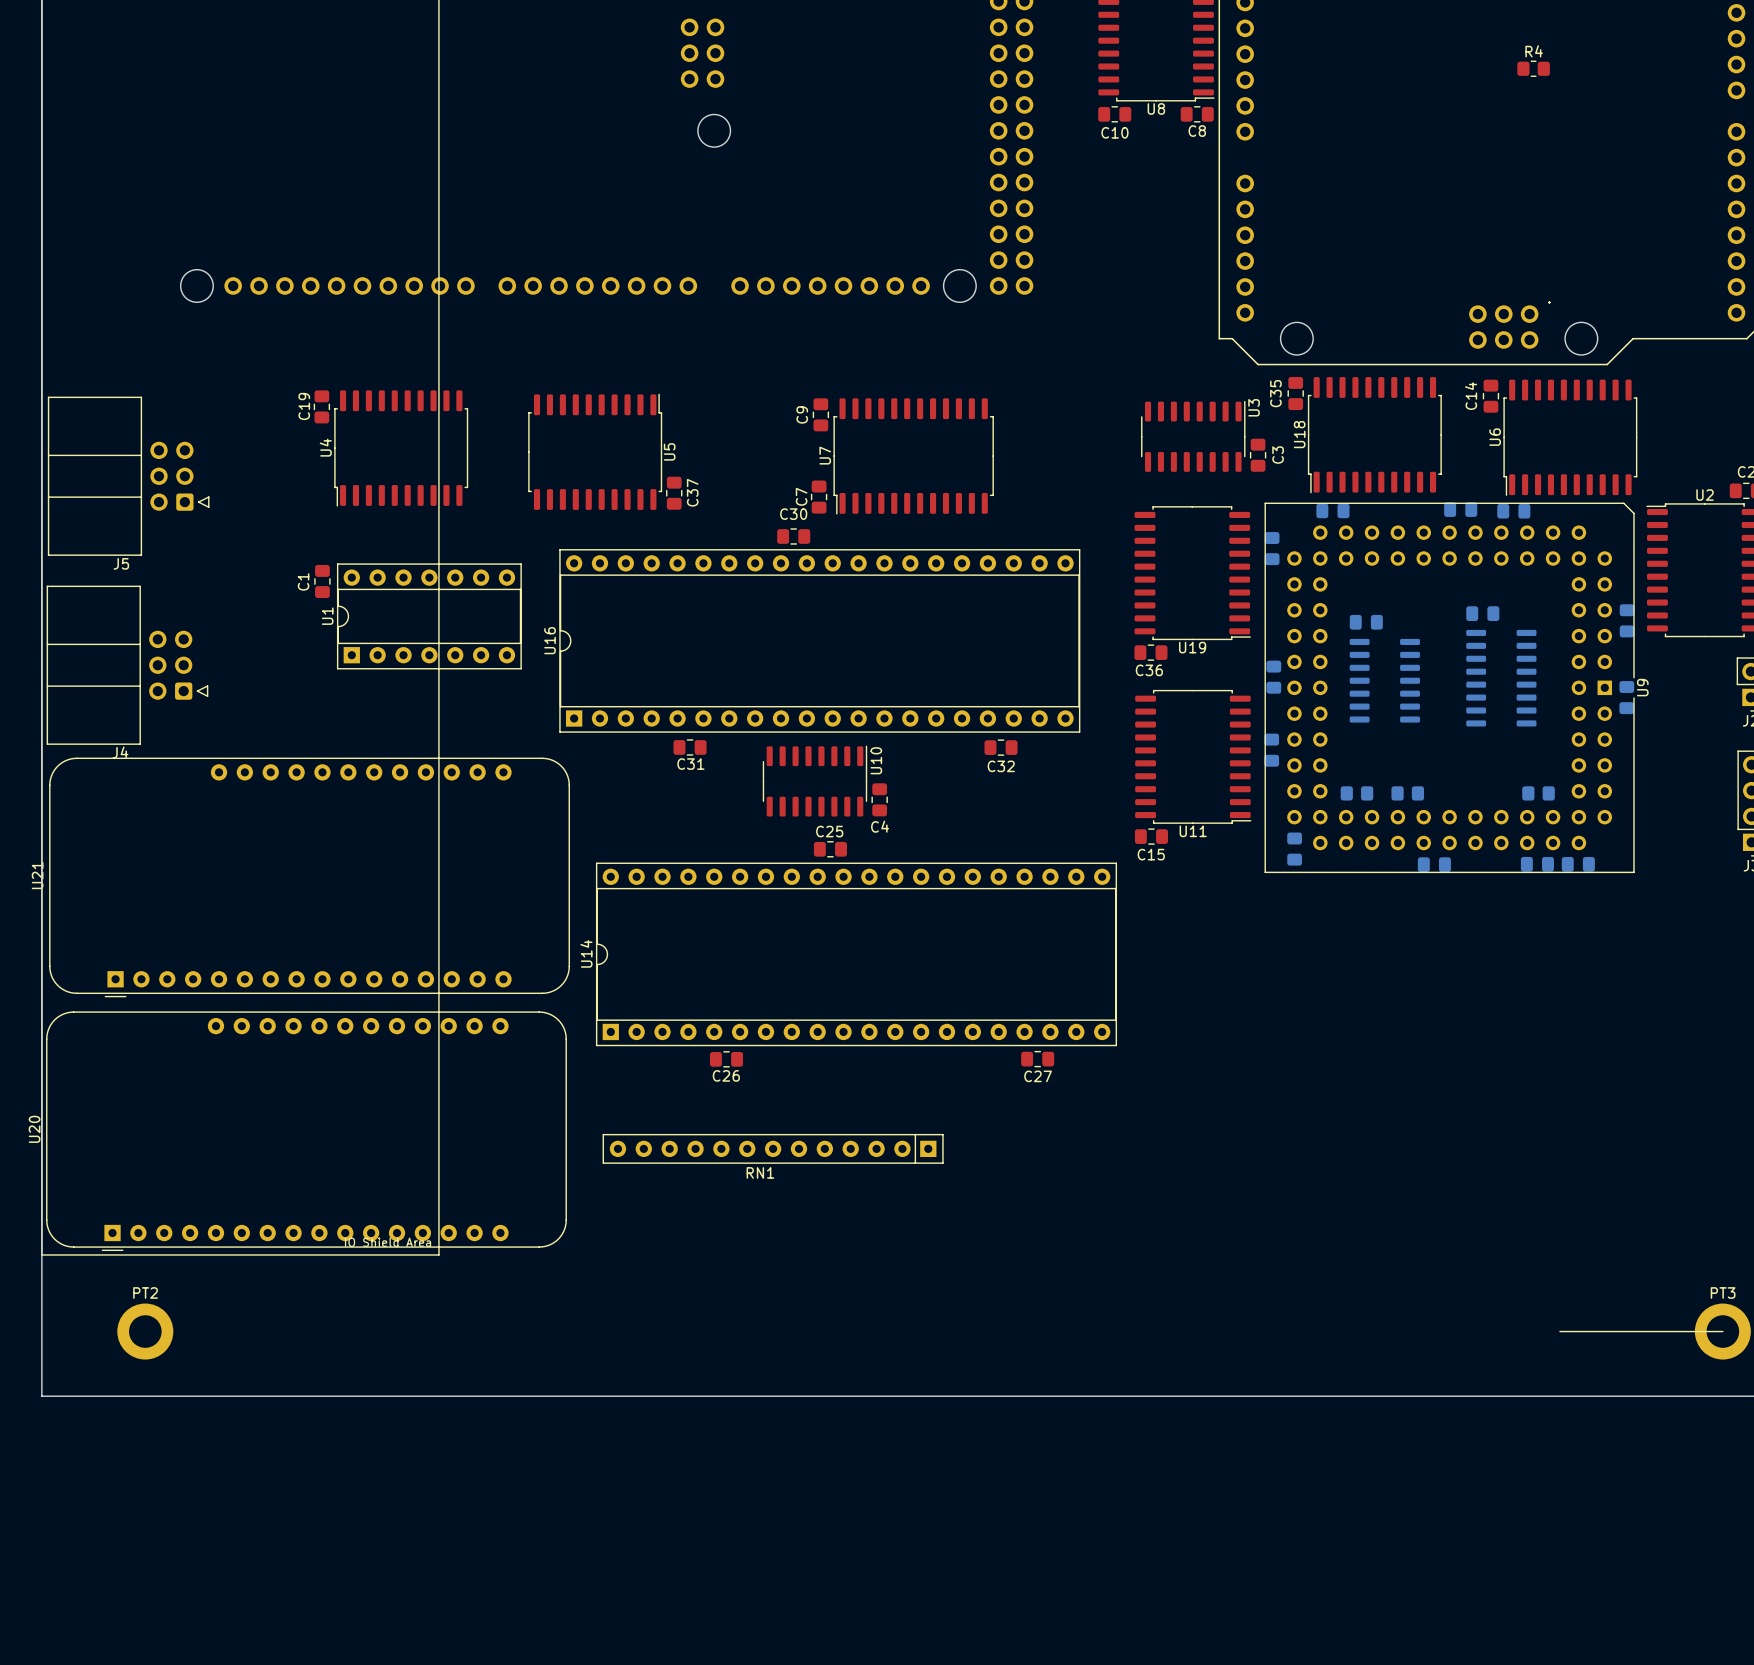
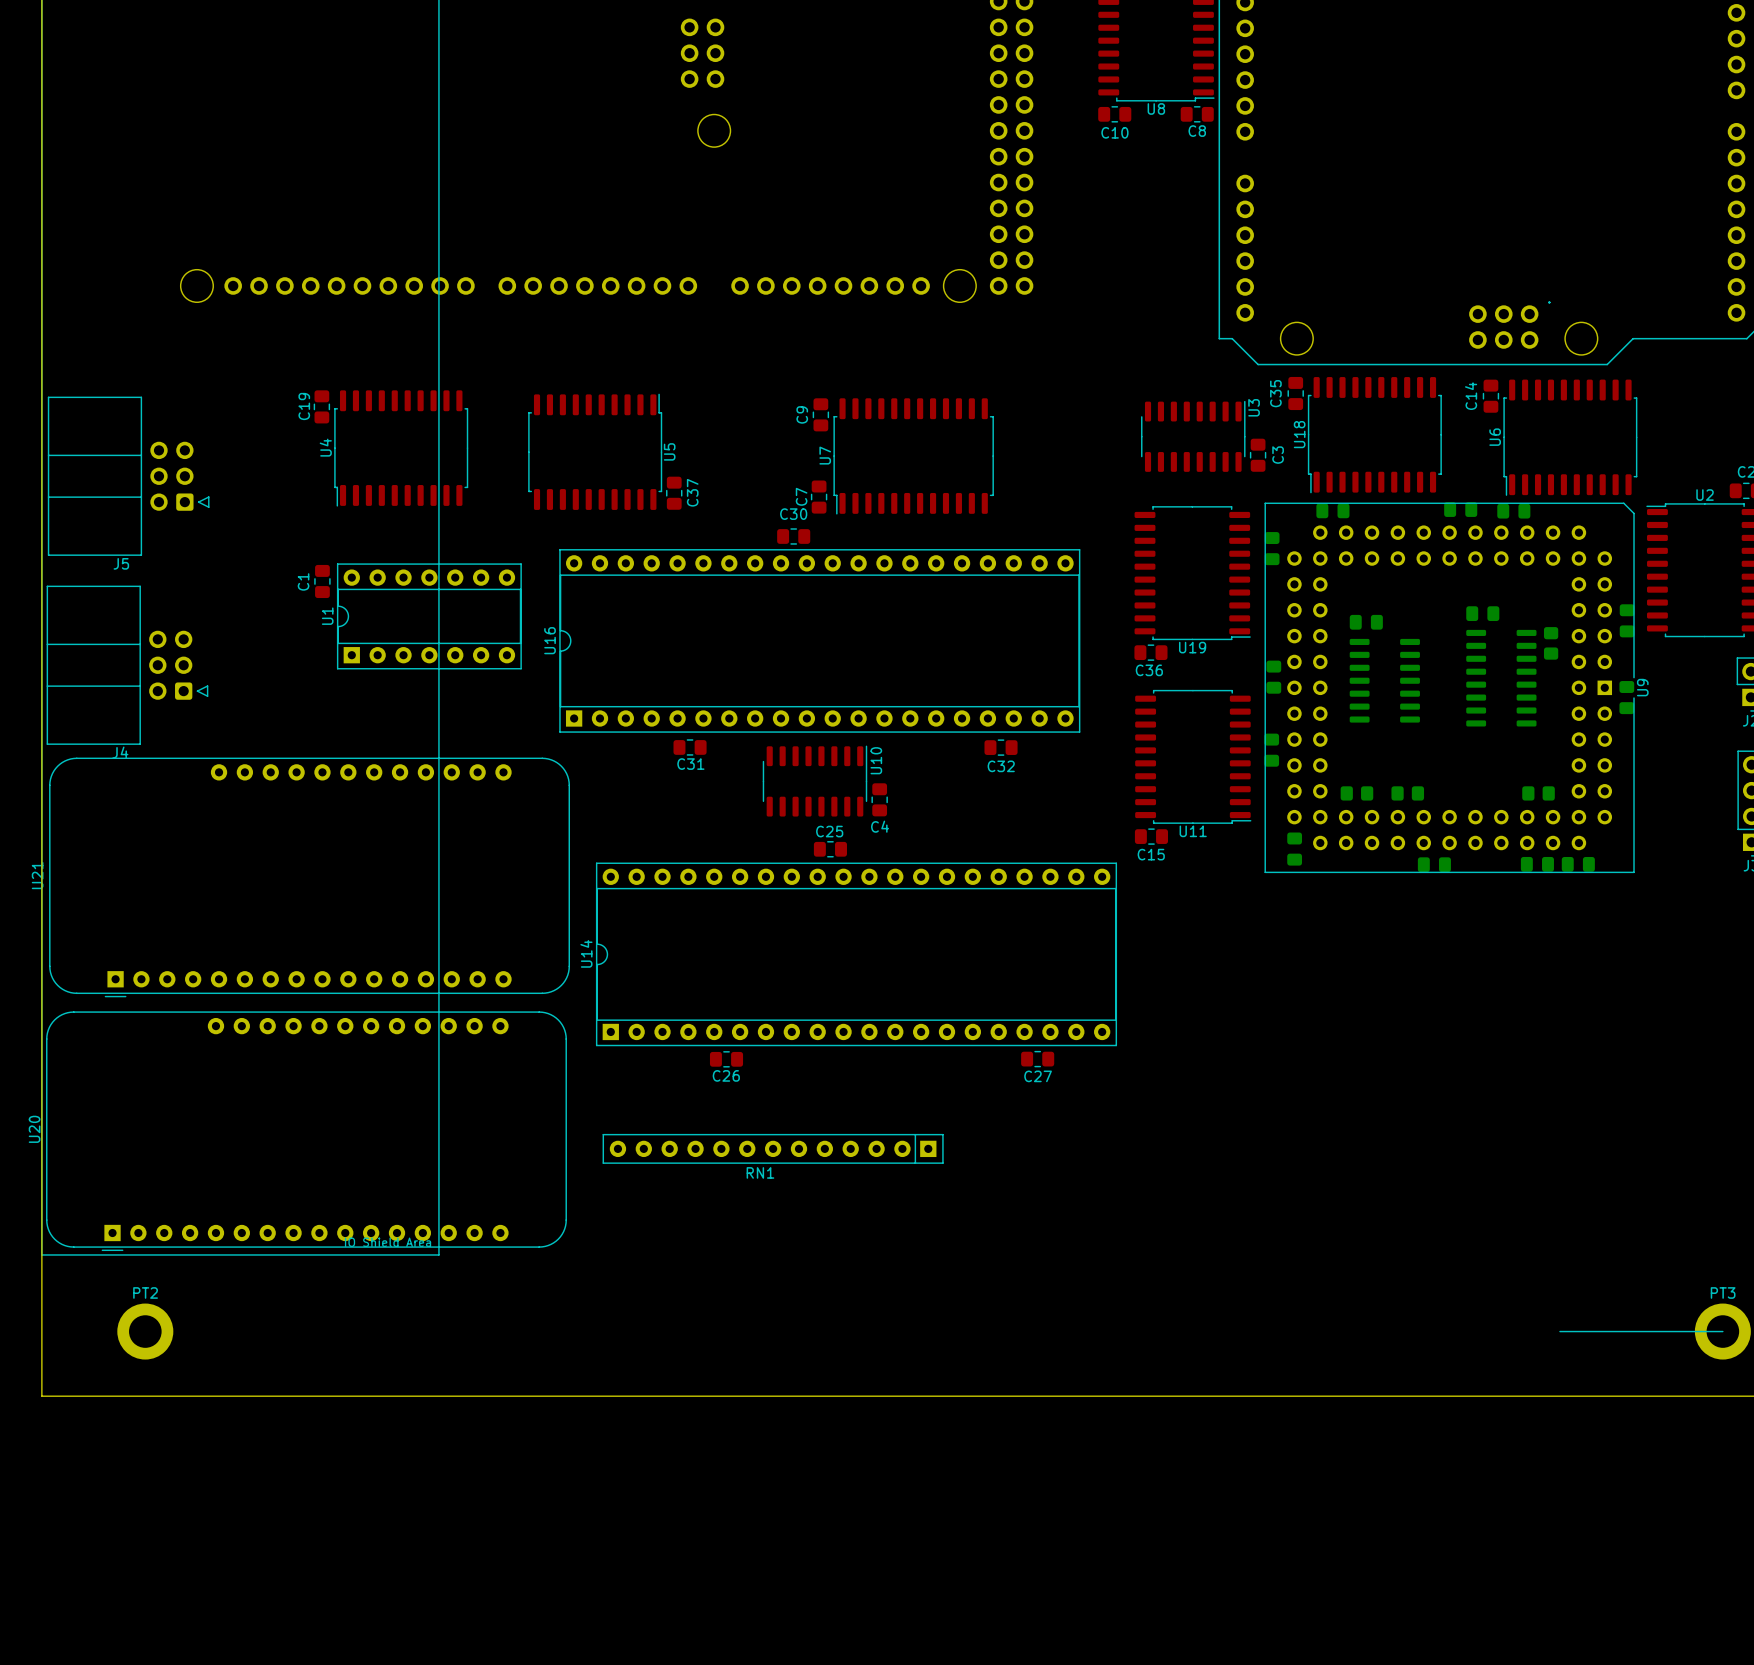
R4: (1533, 68) -> none
part: none -> (1551, 643)

